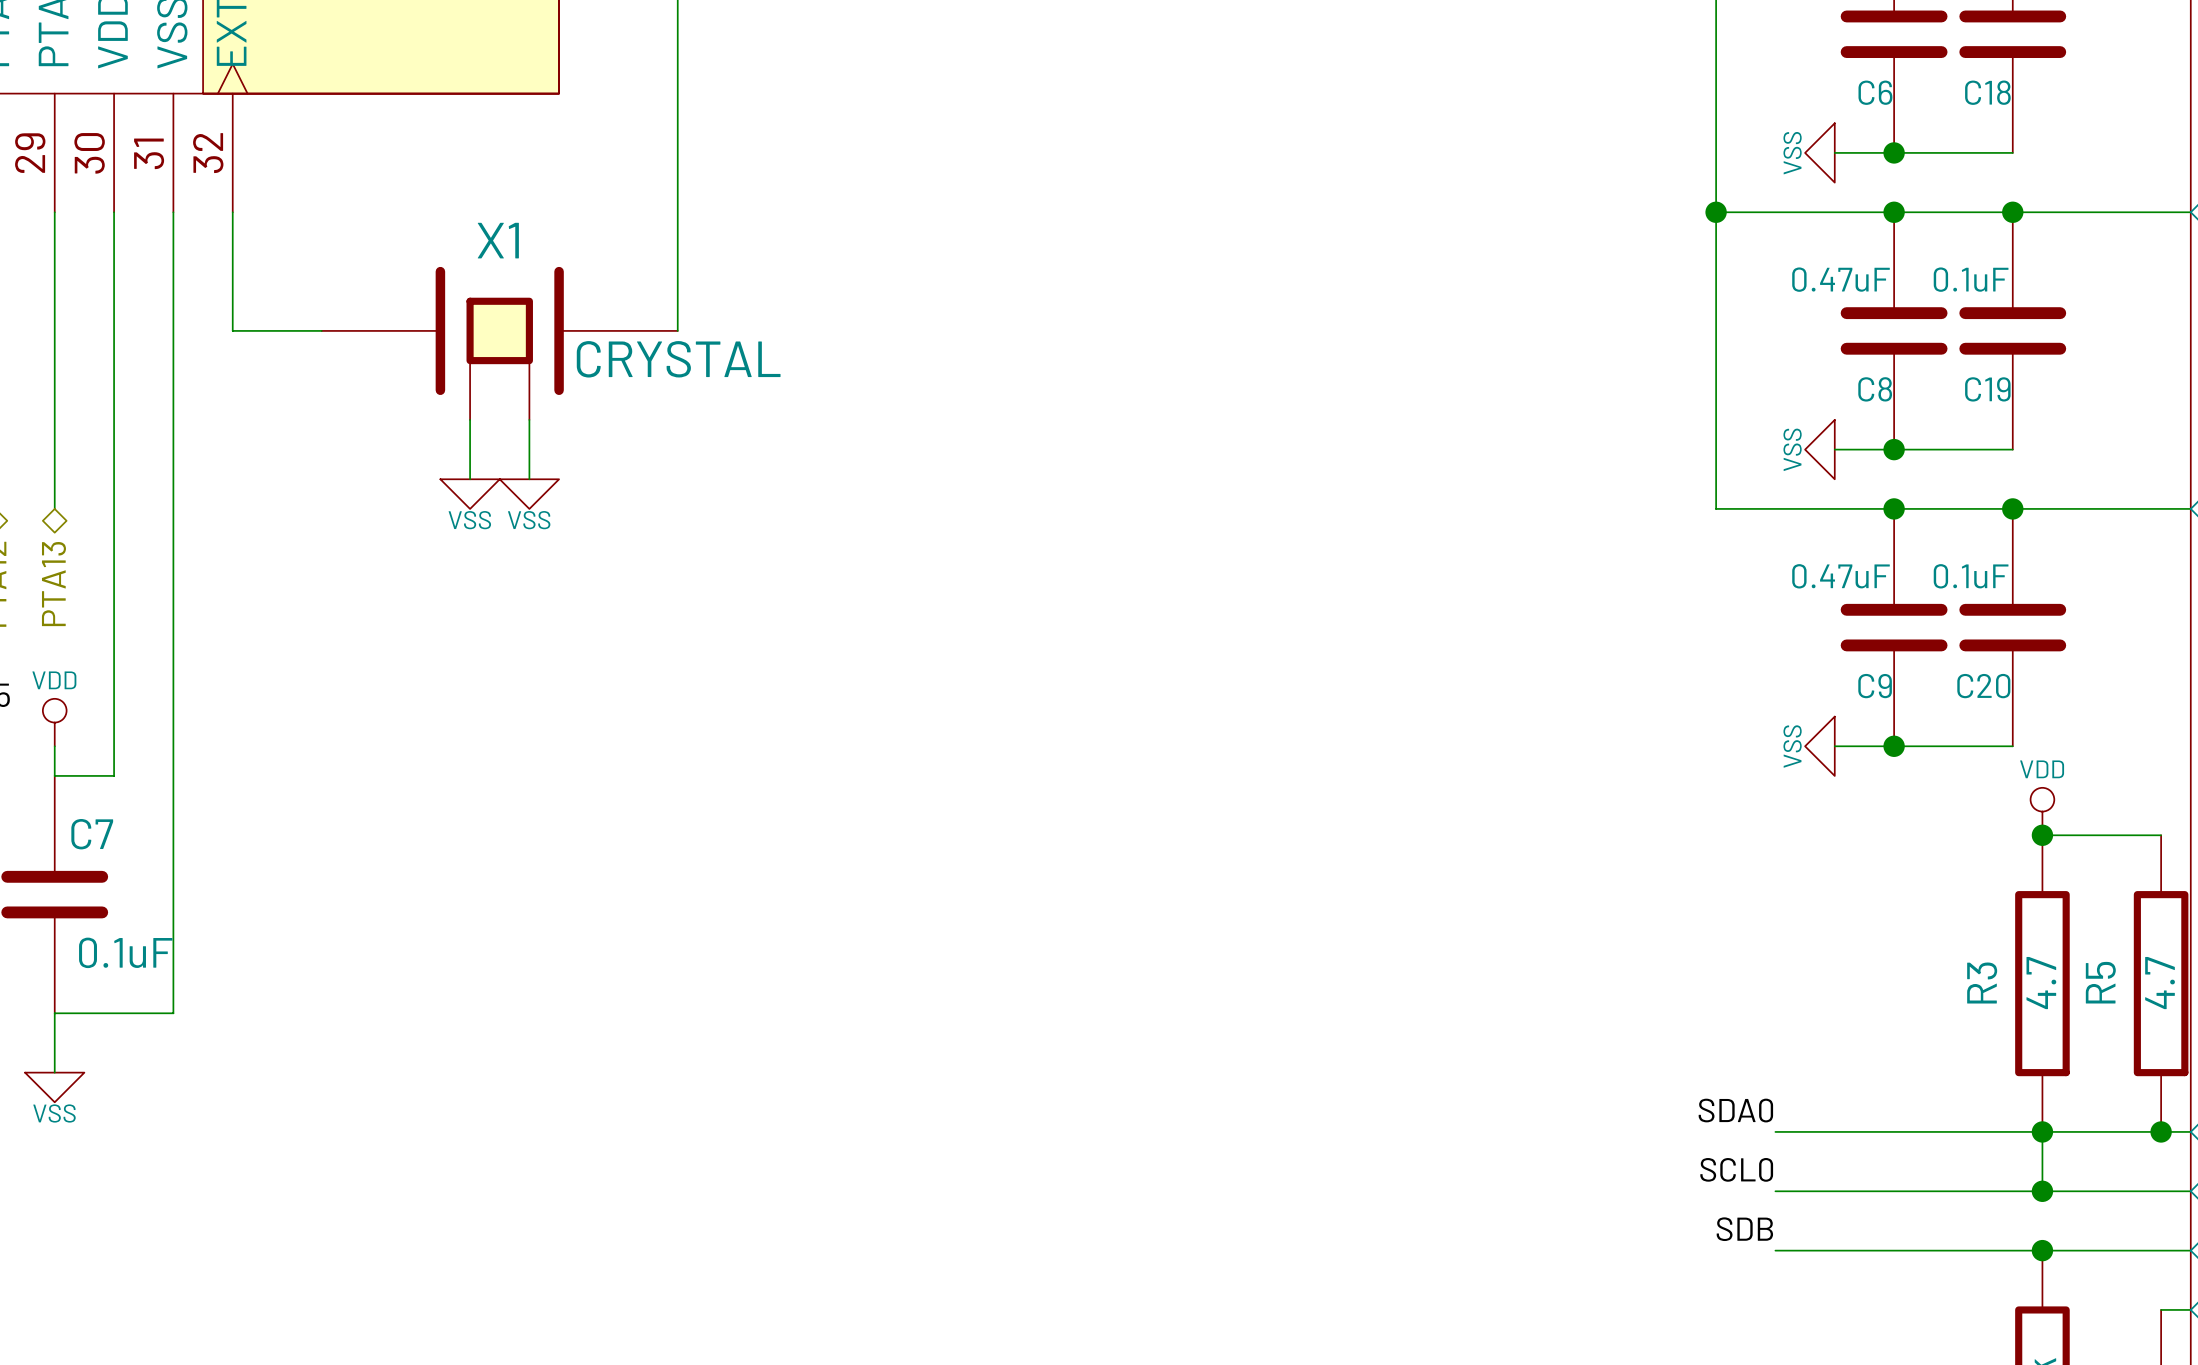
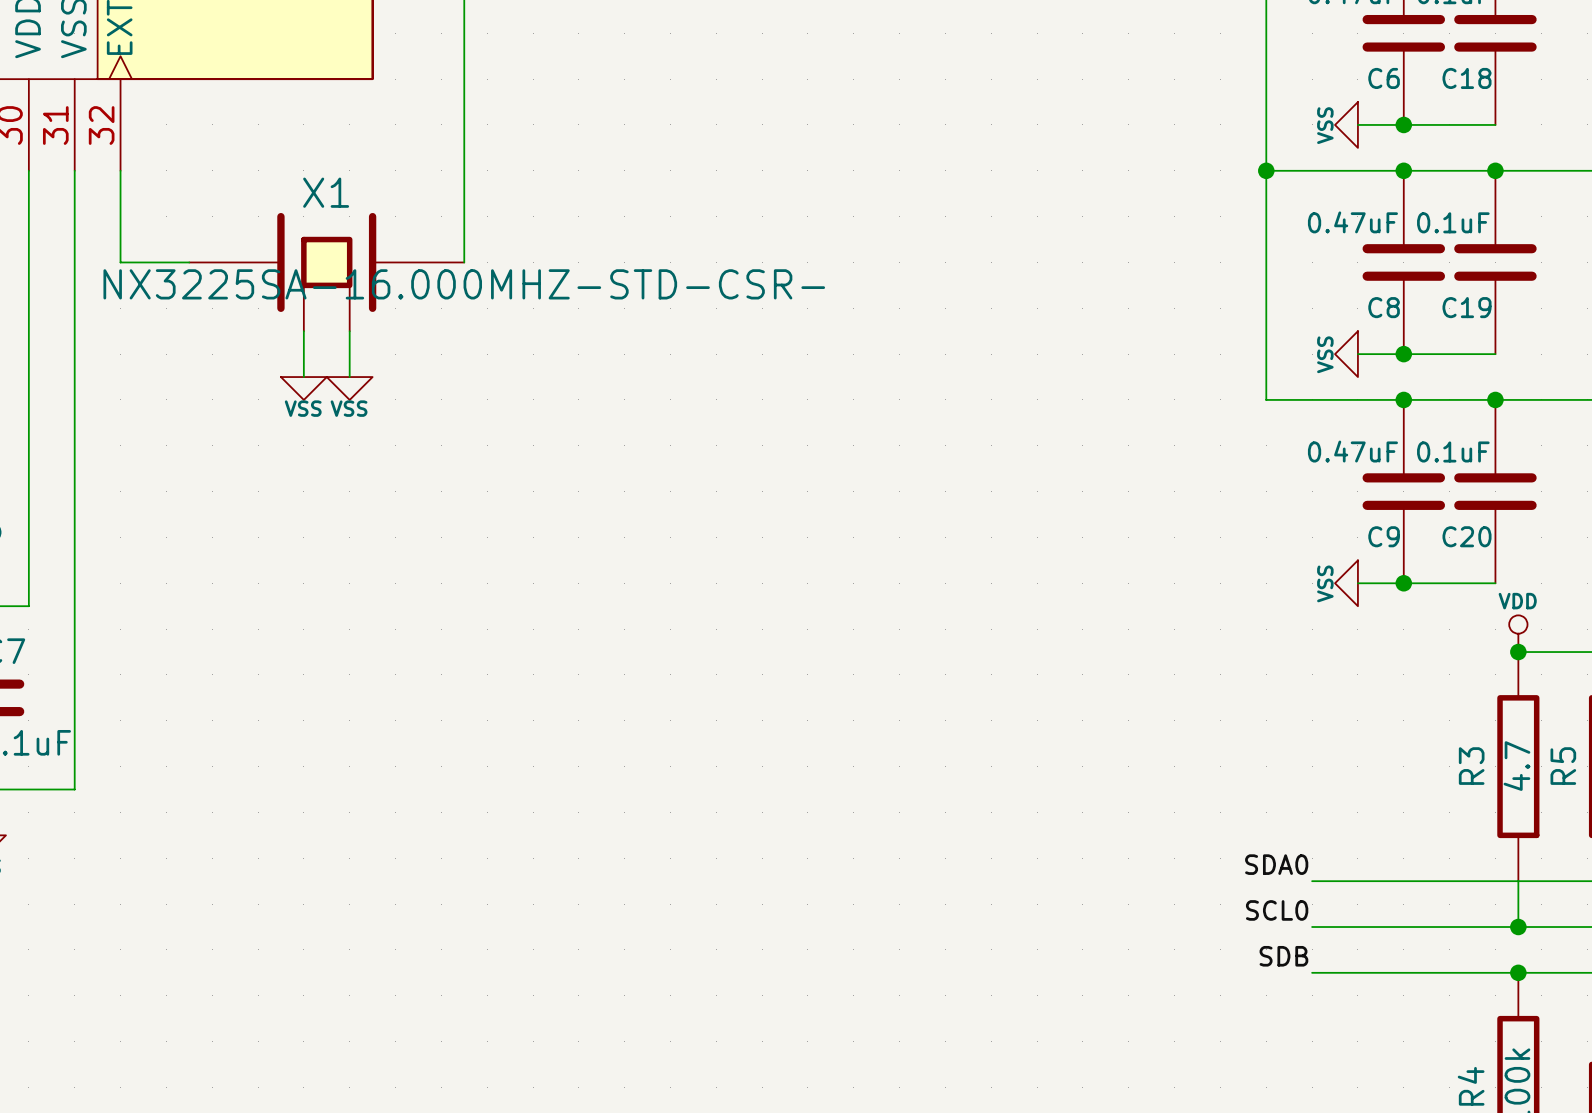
X1 value: CRYSTAL (678, 359) -> NX3225SA-16.000MHZ-STD-CSR- (464, 284)
junction: (2042, 1131) -> none

